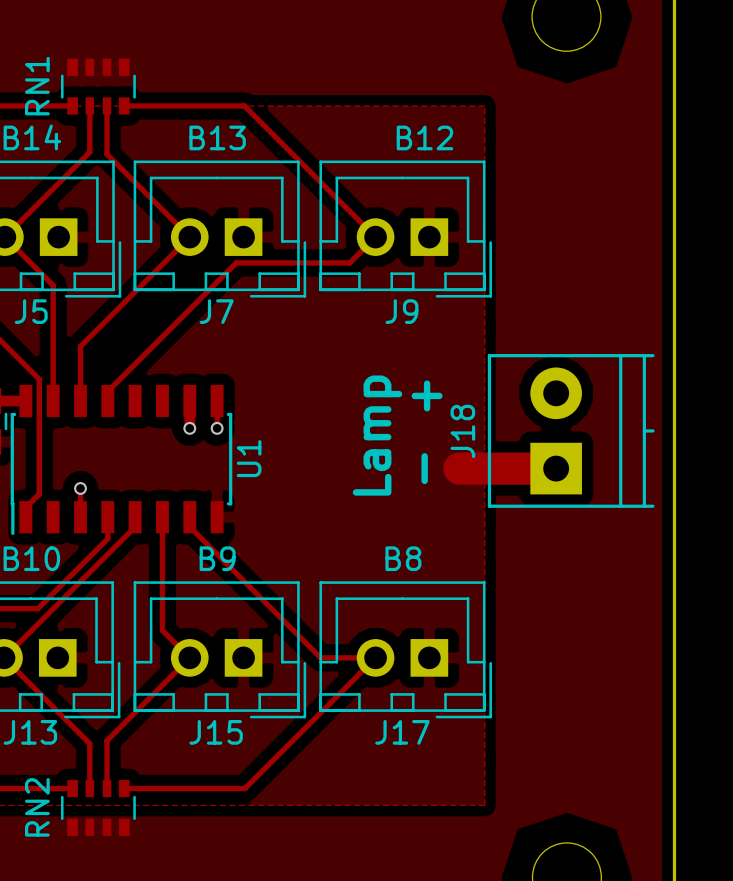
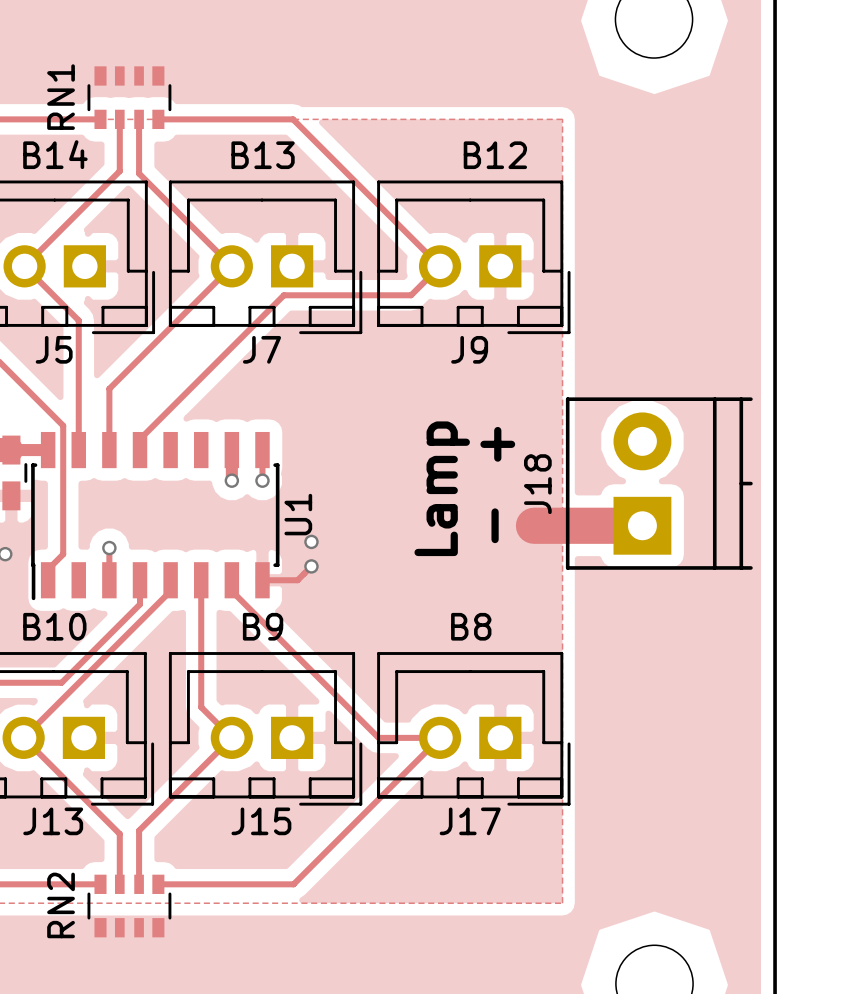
via: none -> (311, 541)
track: none -> (311, 566) (297, 580) (262, 580)
via: none -> (311, 566)

